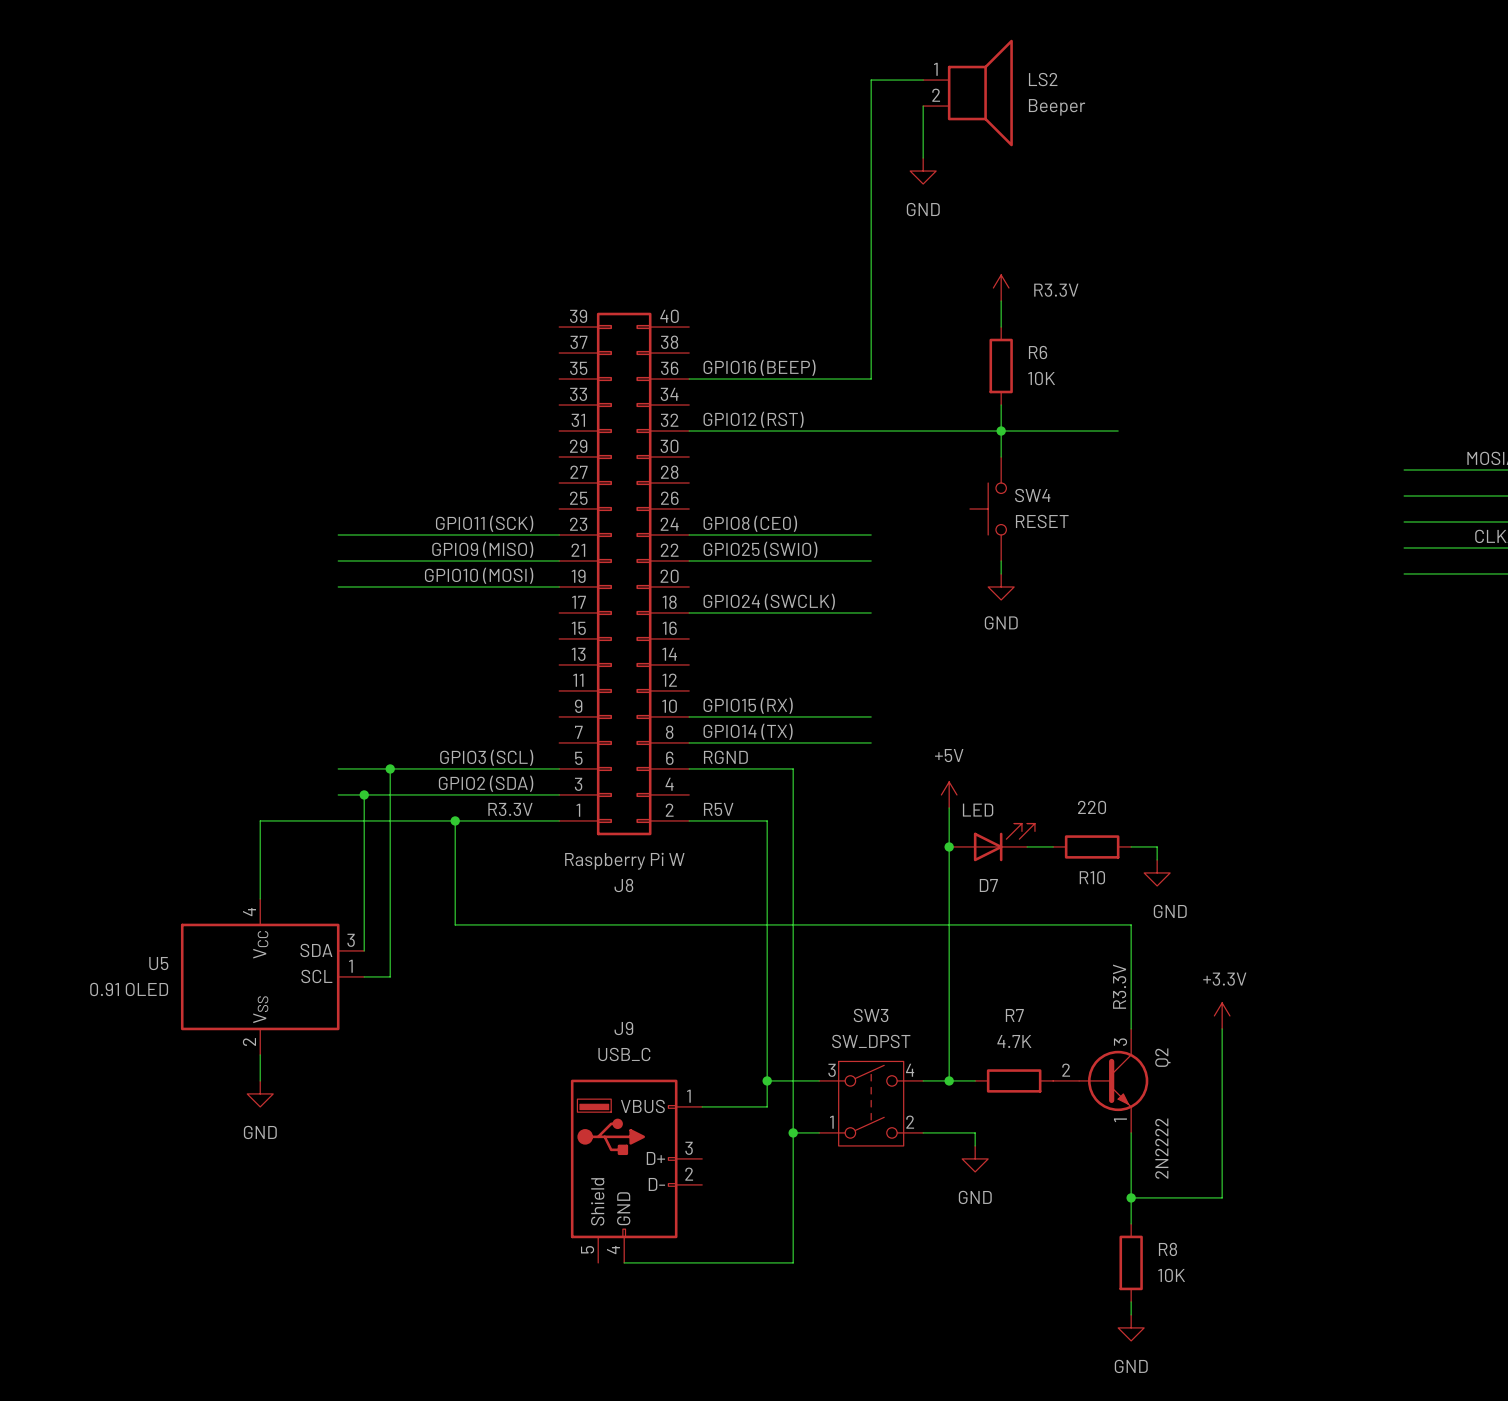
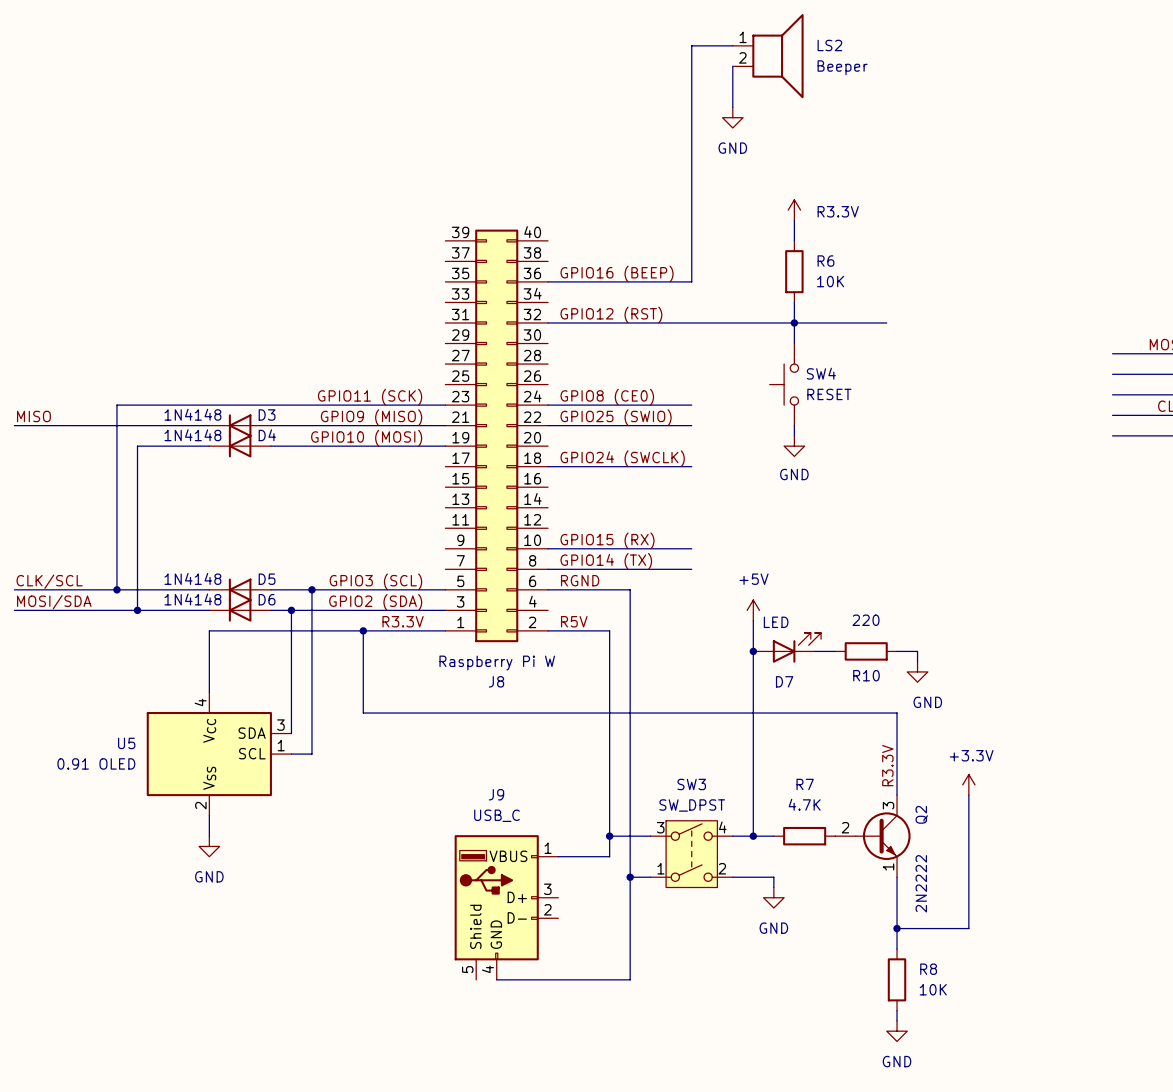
wire: none -> (270, 405) (116, 405) (116, 589)
label: none -> MISO (33, 416)
wire: none -> (14, 425) (209, 425)
D3: none -> 1N4148 (240, 425)
wire: none -> (209, 446) (137, 446) (137, 610)
D4: none -> 1N4148 (240, 446)
label: none -> CLK/SCL (49, 581)
wire: none -> (14, 589) (209, 589)
junction: none -> (116, 589)
D5: none -> 1N4148 (240, 589)
label: none -> MOSI/SDA (54, 602)
wire: none -> (14, 610) (209, 610)
junction: none -> (137, 610)
D6: none -> 1N4148 (240, 610)

